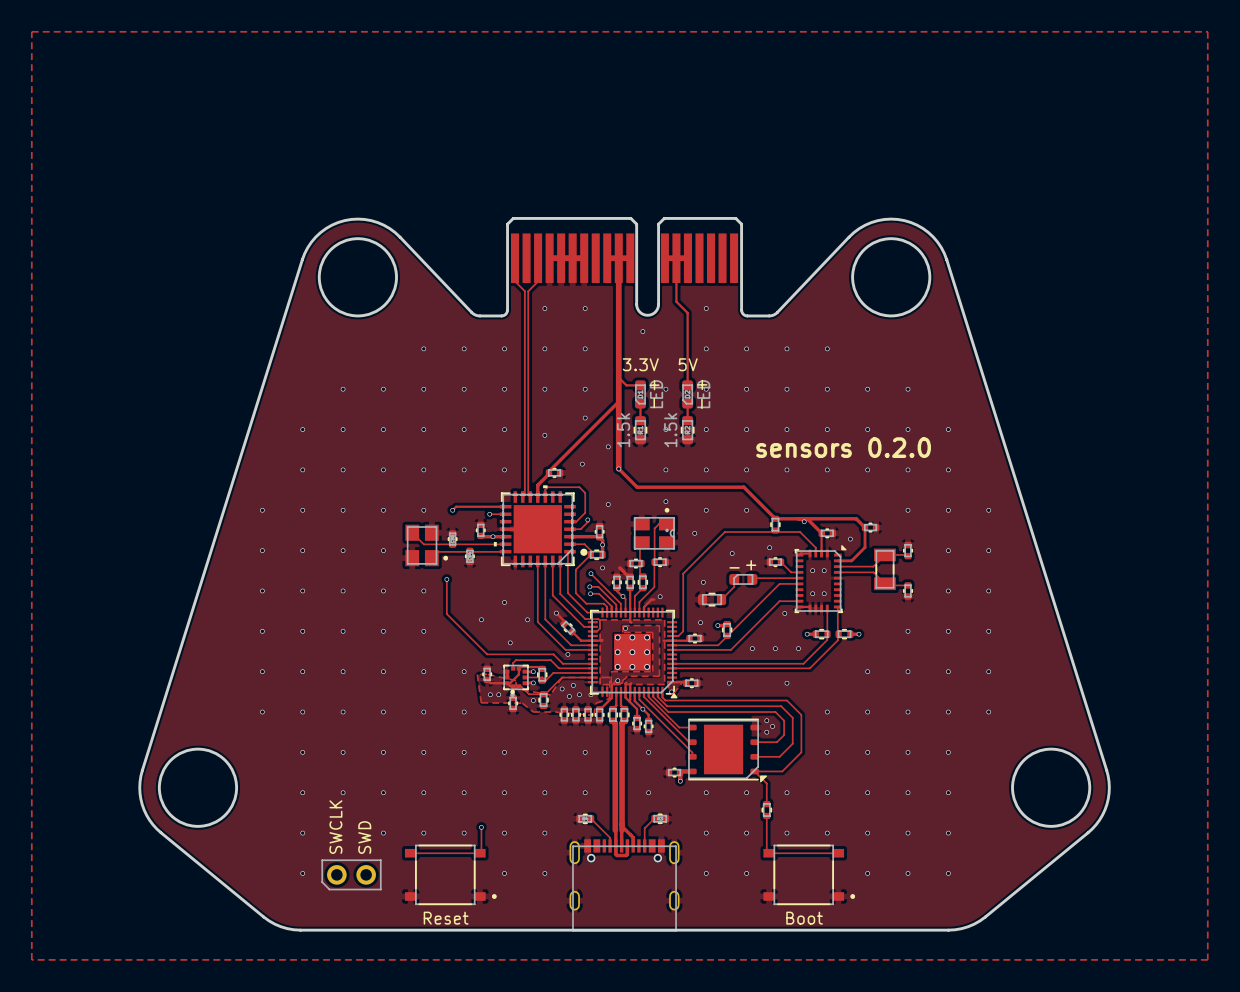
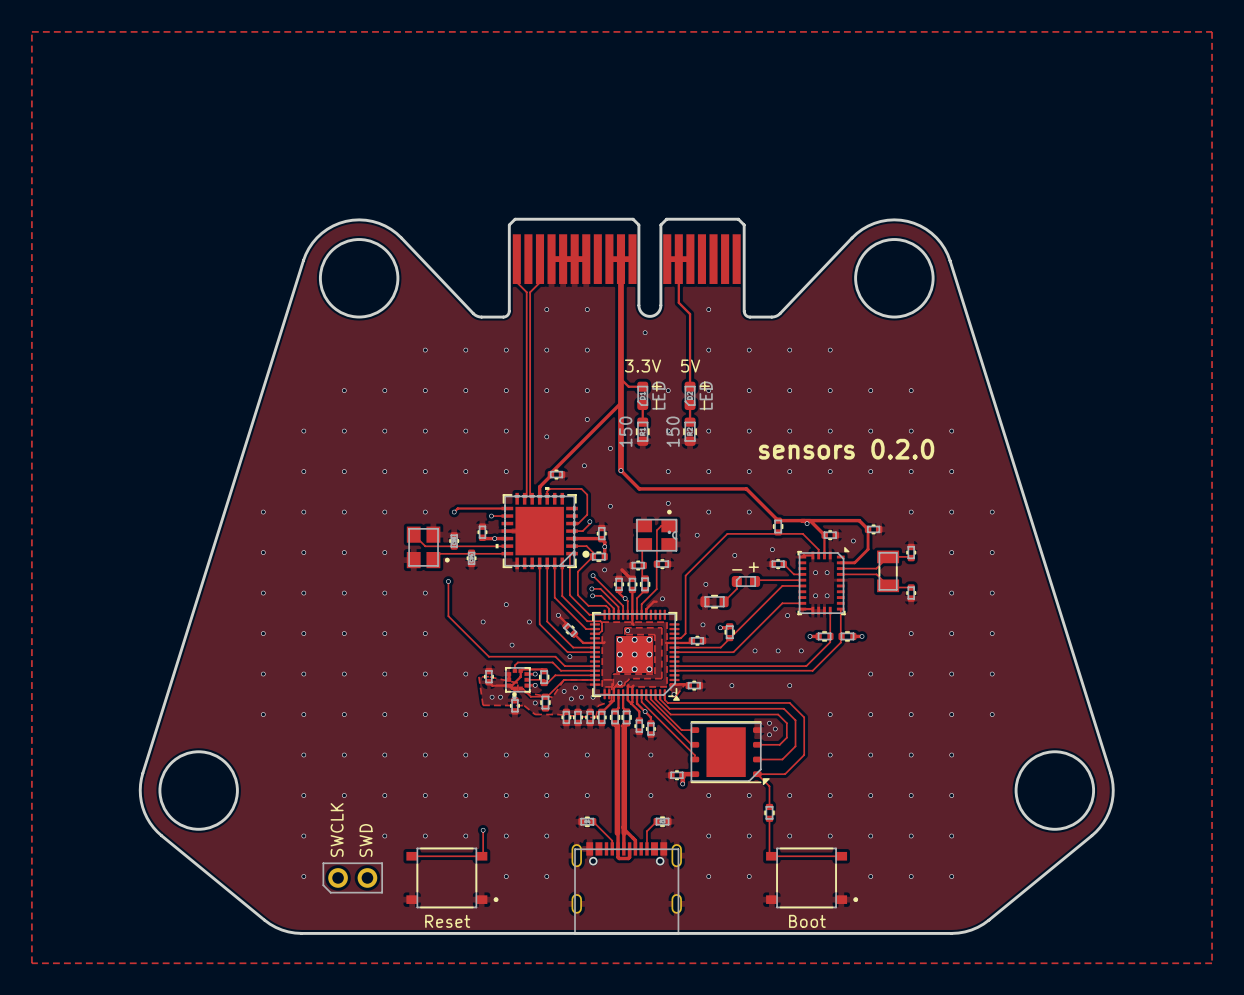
part value: 1.5k (623, 430) -> 150 (625, 431)
part value: 1.5k (670, 430) -> 150 (673, 431)

